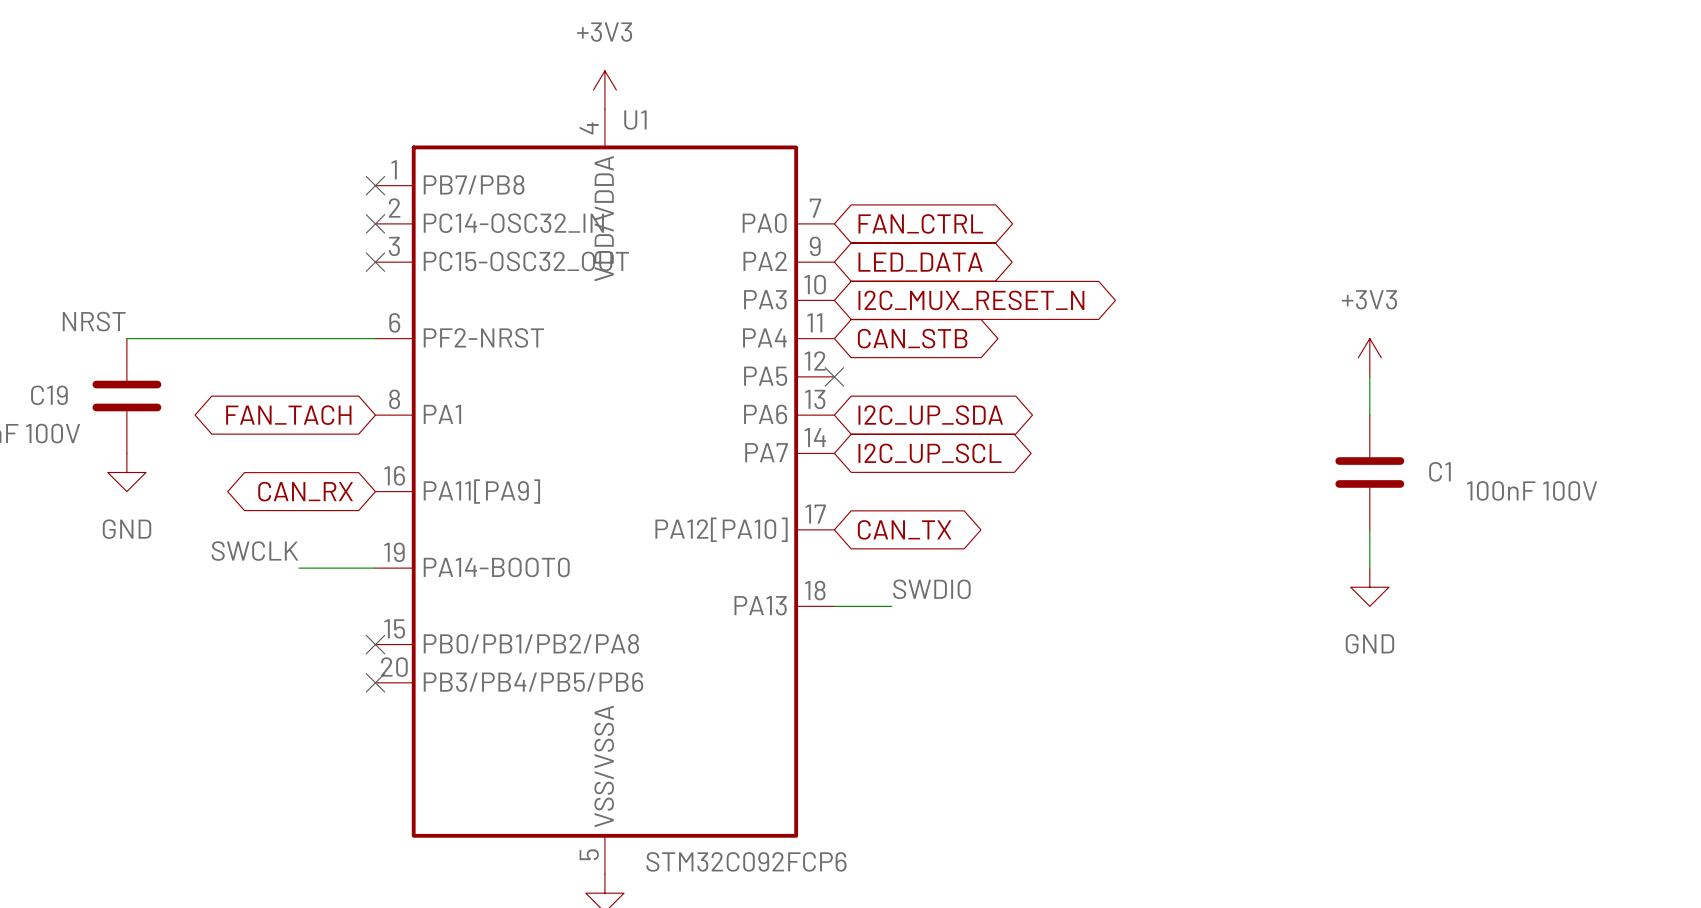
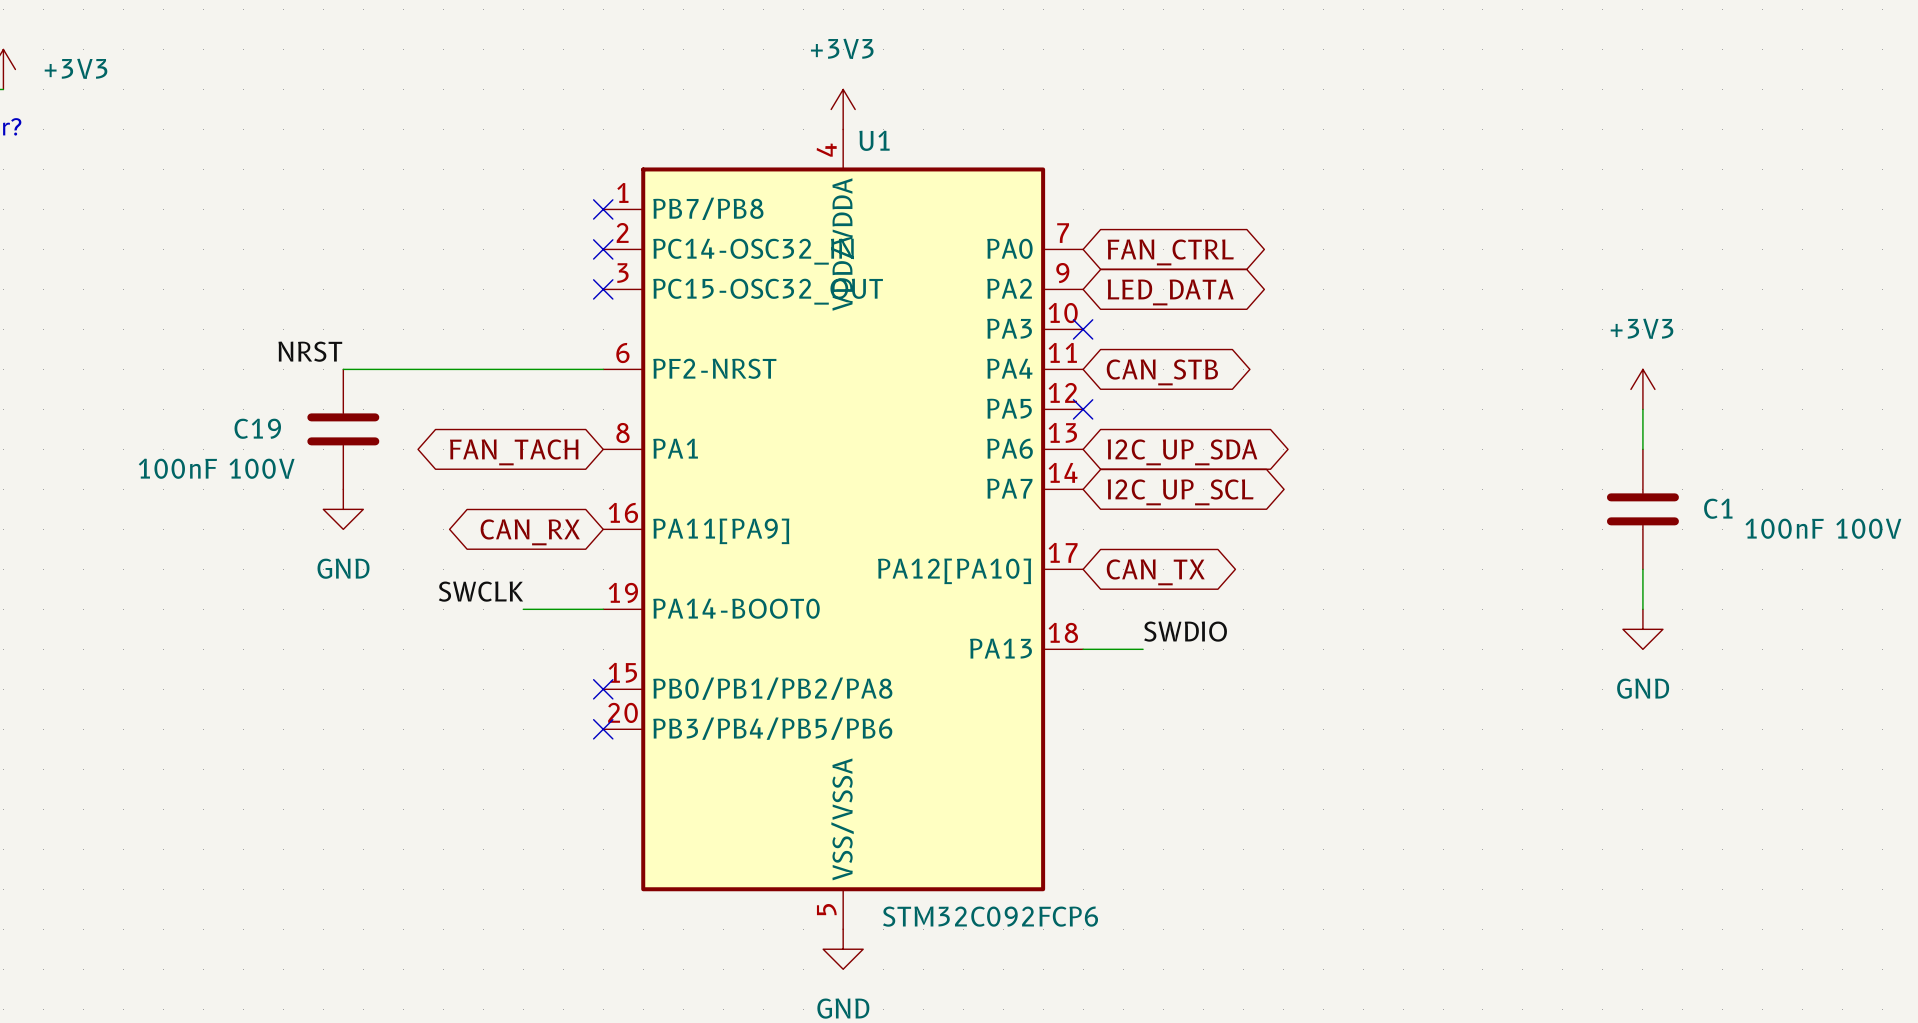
no-connect mark: none -> (1083, 329)
global label: I2C_MUX_RESET_N (971, 300) -> none

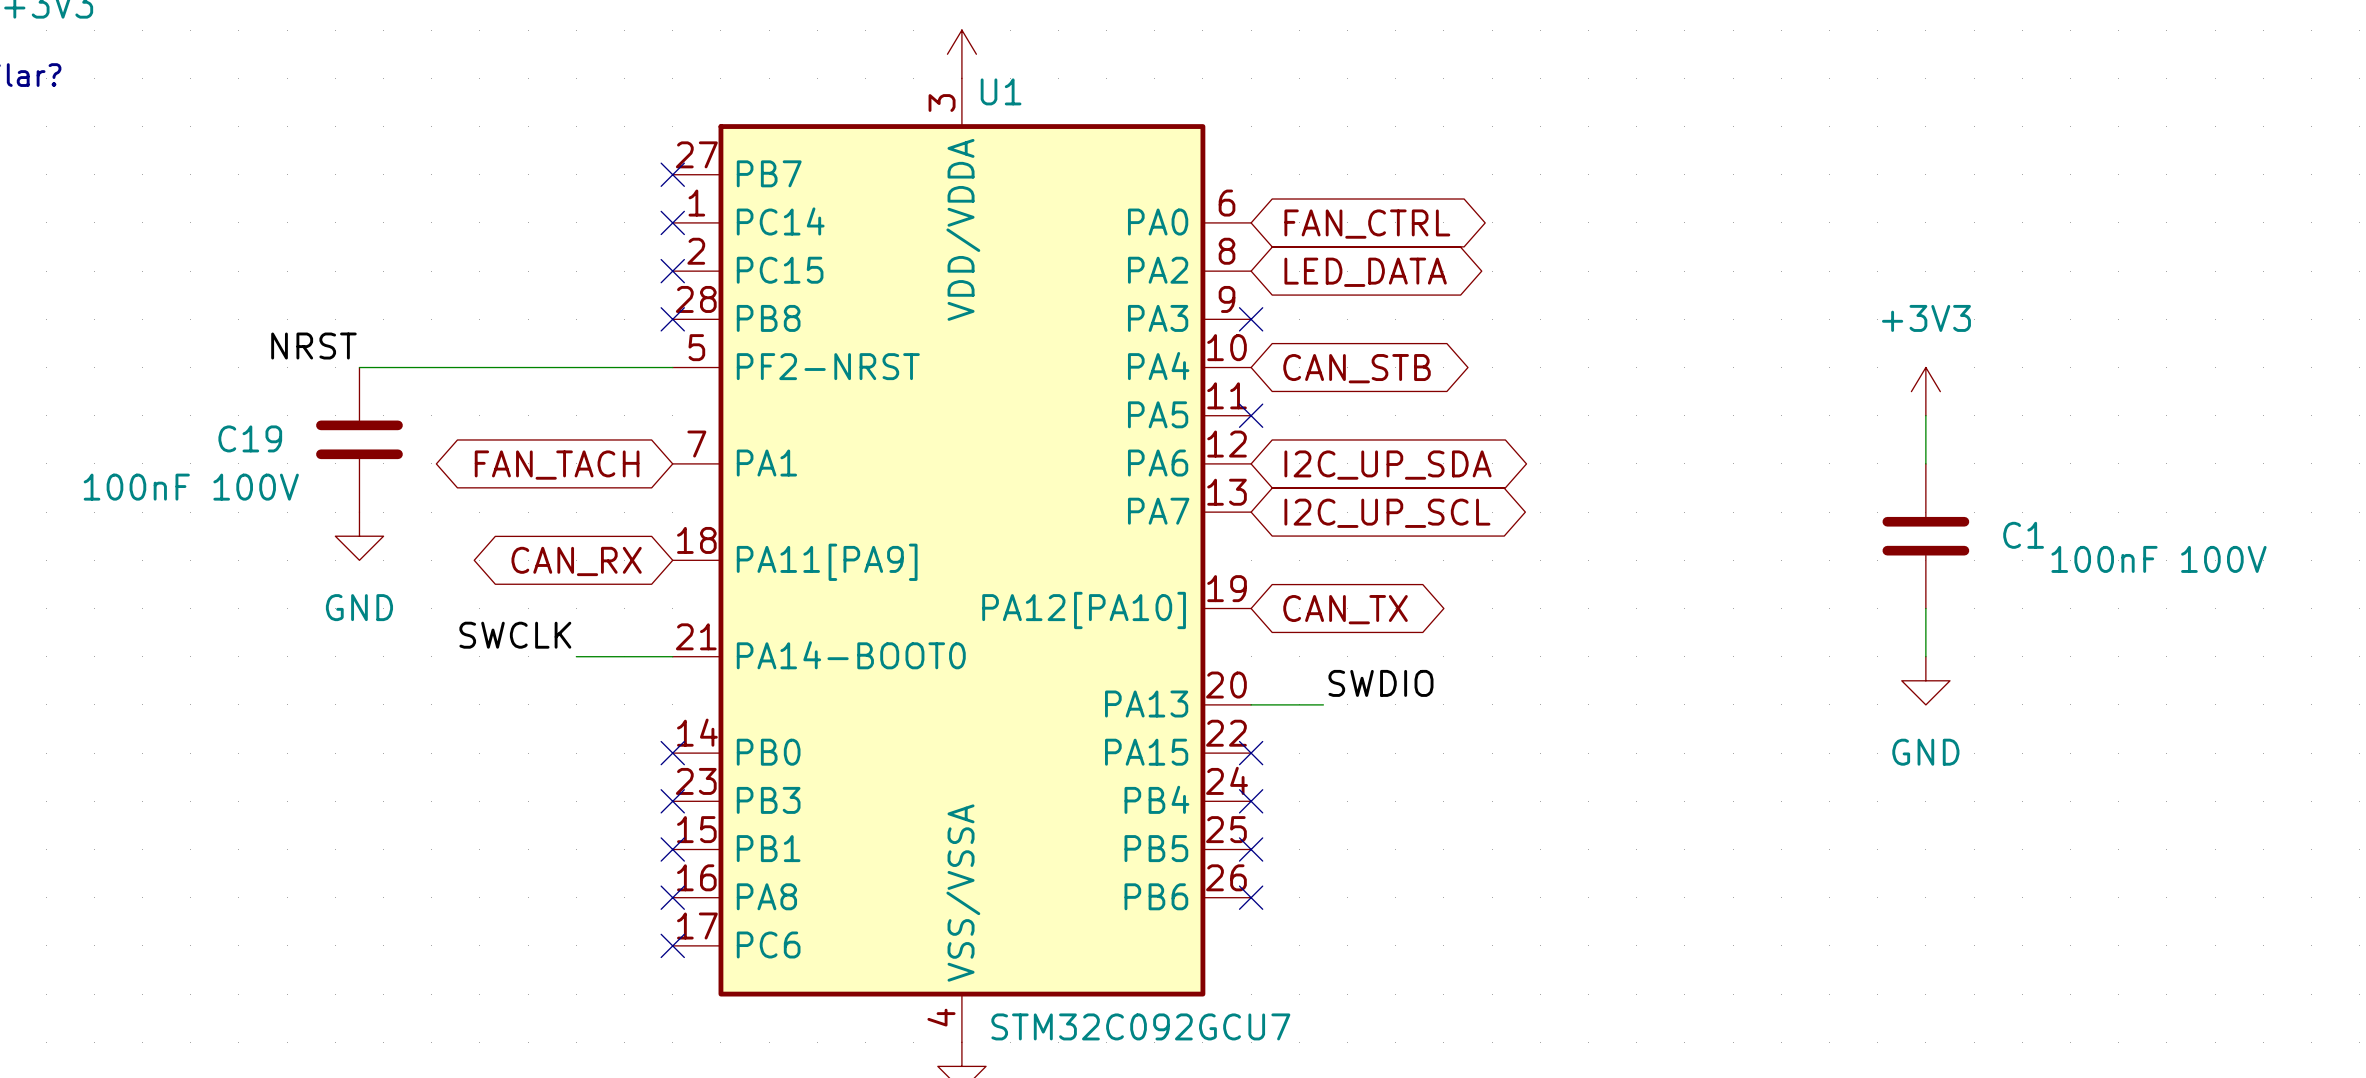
U1 symbol: [603, 129, 1084, 930] -> [672, 78, 1252, 1043]
no-connect mark: none -> (672, 319)
no-connect mark: none -> (1251, 753)
no-connect mark: none -> (1251, 801)
no-connect mark: none -> (672, 849)
no-connect mark: none -> (1251, 849)
no-connect mark: none -> (672, 897)
no-connect mark: none -> (1251, 897)
no-connect mark: none -> (672, 945)
U1 value: STM32C092FCP6 (990, 916) -> STM32C092GCU7 (1140, 1026)

